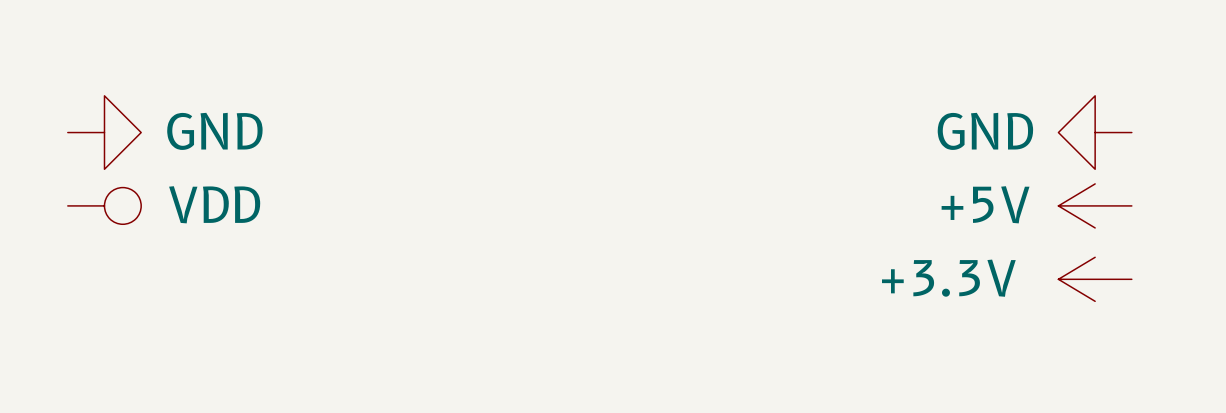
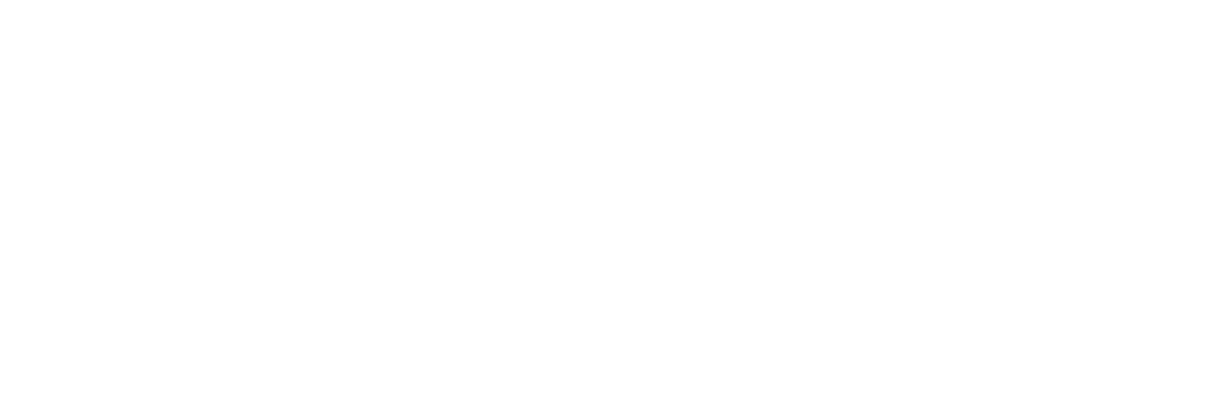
power symbol: GND (104, 132) -> none
power symbol: GND (1095, 132) -> none
power symbol: VDD (104, 205) -> none
power symbol: +5V (1095, 205) -> none
power symbol: +3.3V (1095, 279) -> none

